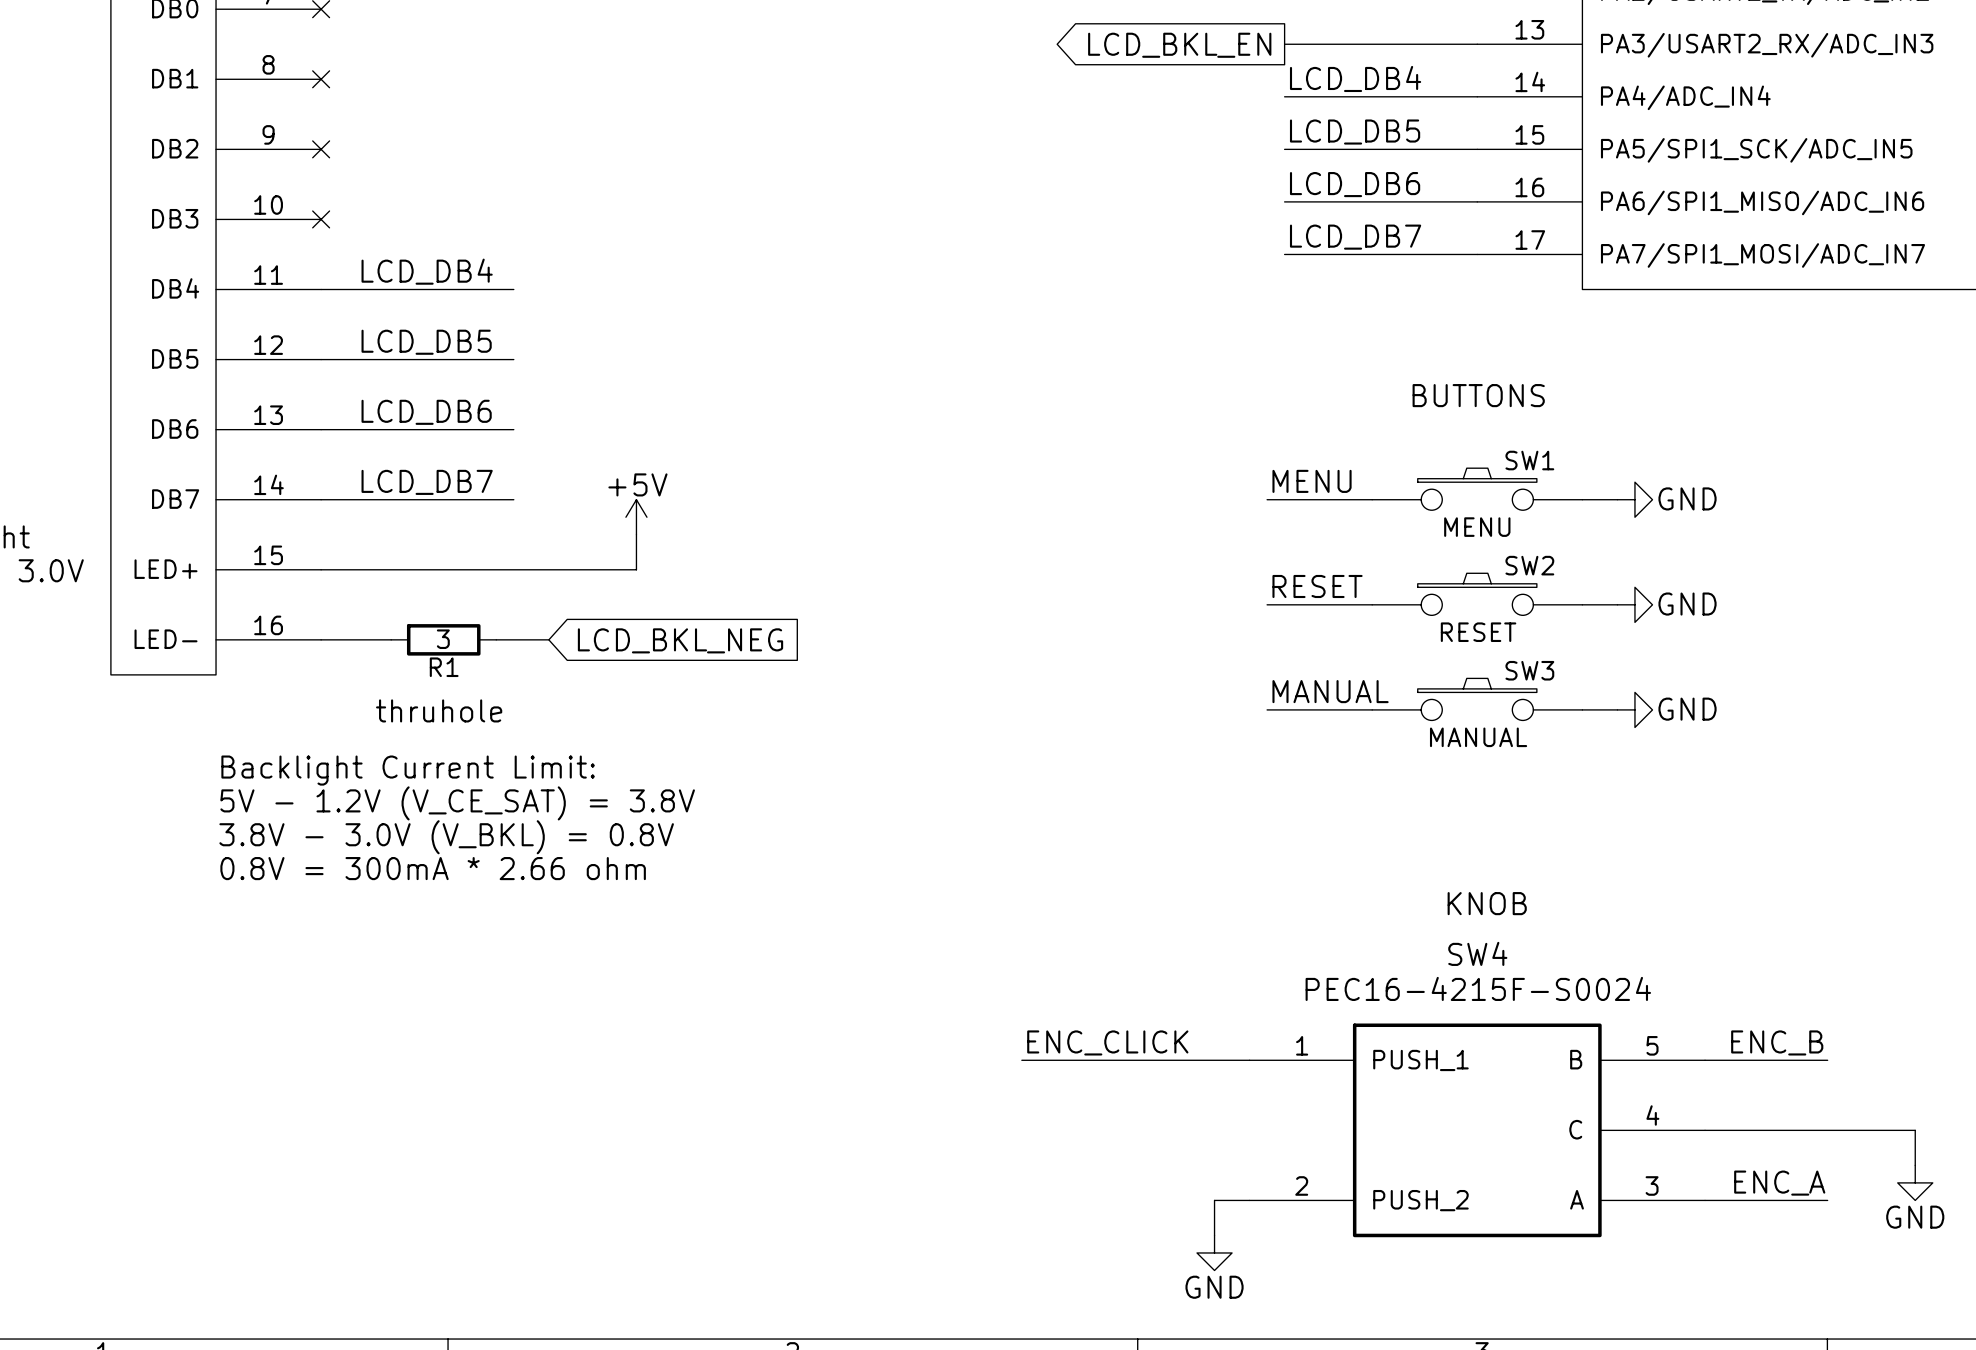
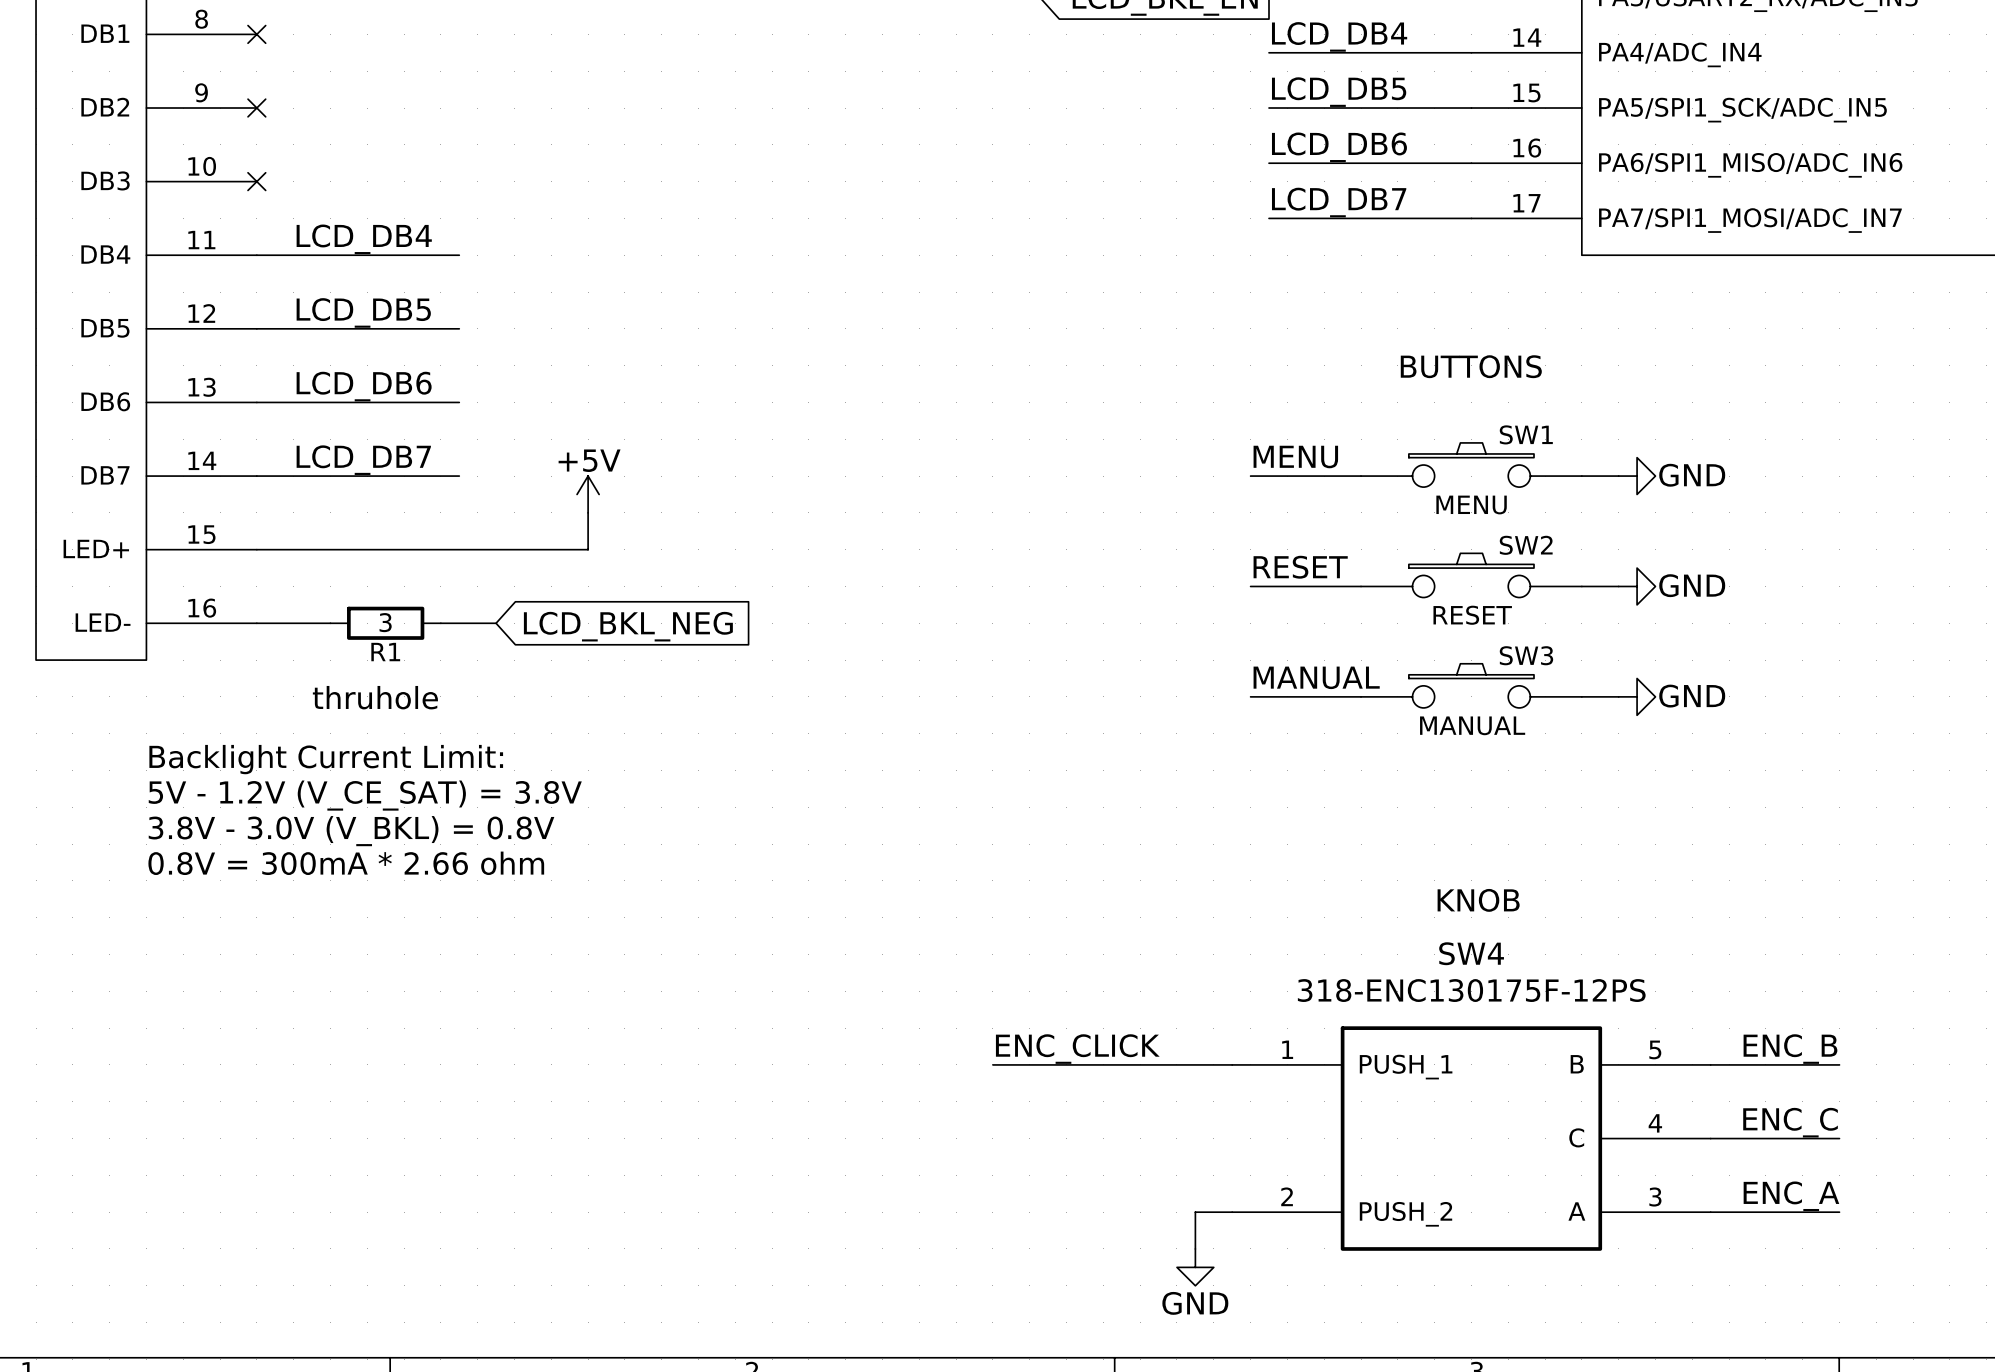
SW4 value: PEC16-4215F-S0024 (1478, 988) -> 318-ENC130175F-12PS (1471, 990)
label: none -> ENC_C (1790, 1122)
wire: (1827, 1130) (1915, 1130) (1915, 1165) -> none
power symbol: GND (1915, 1182) -> none

